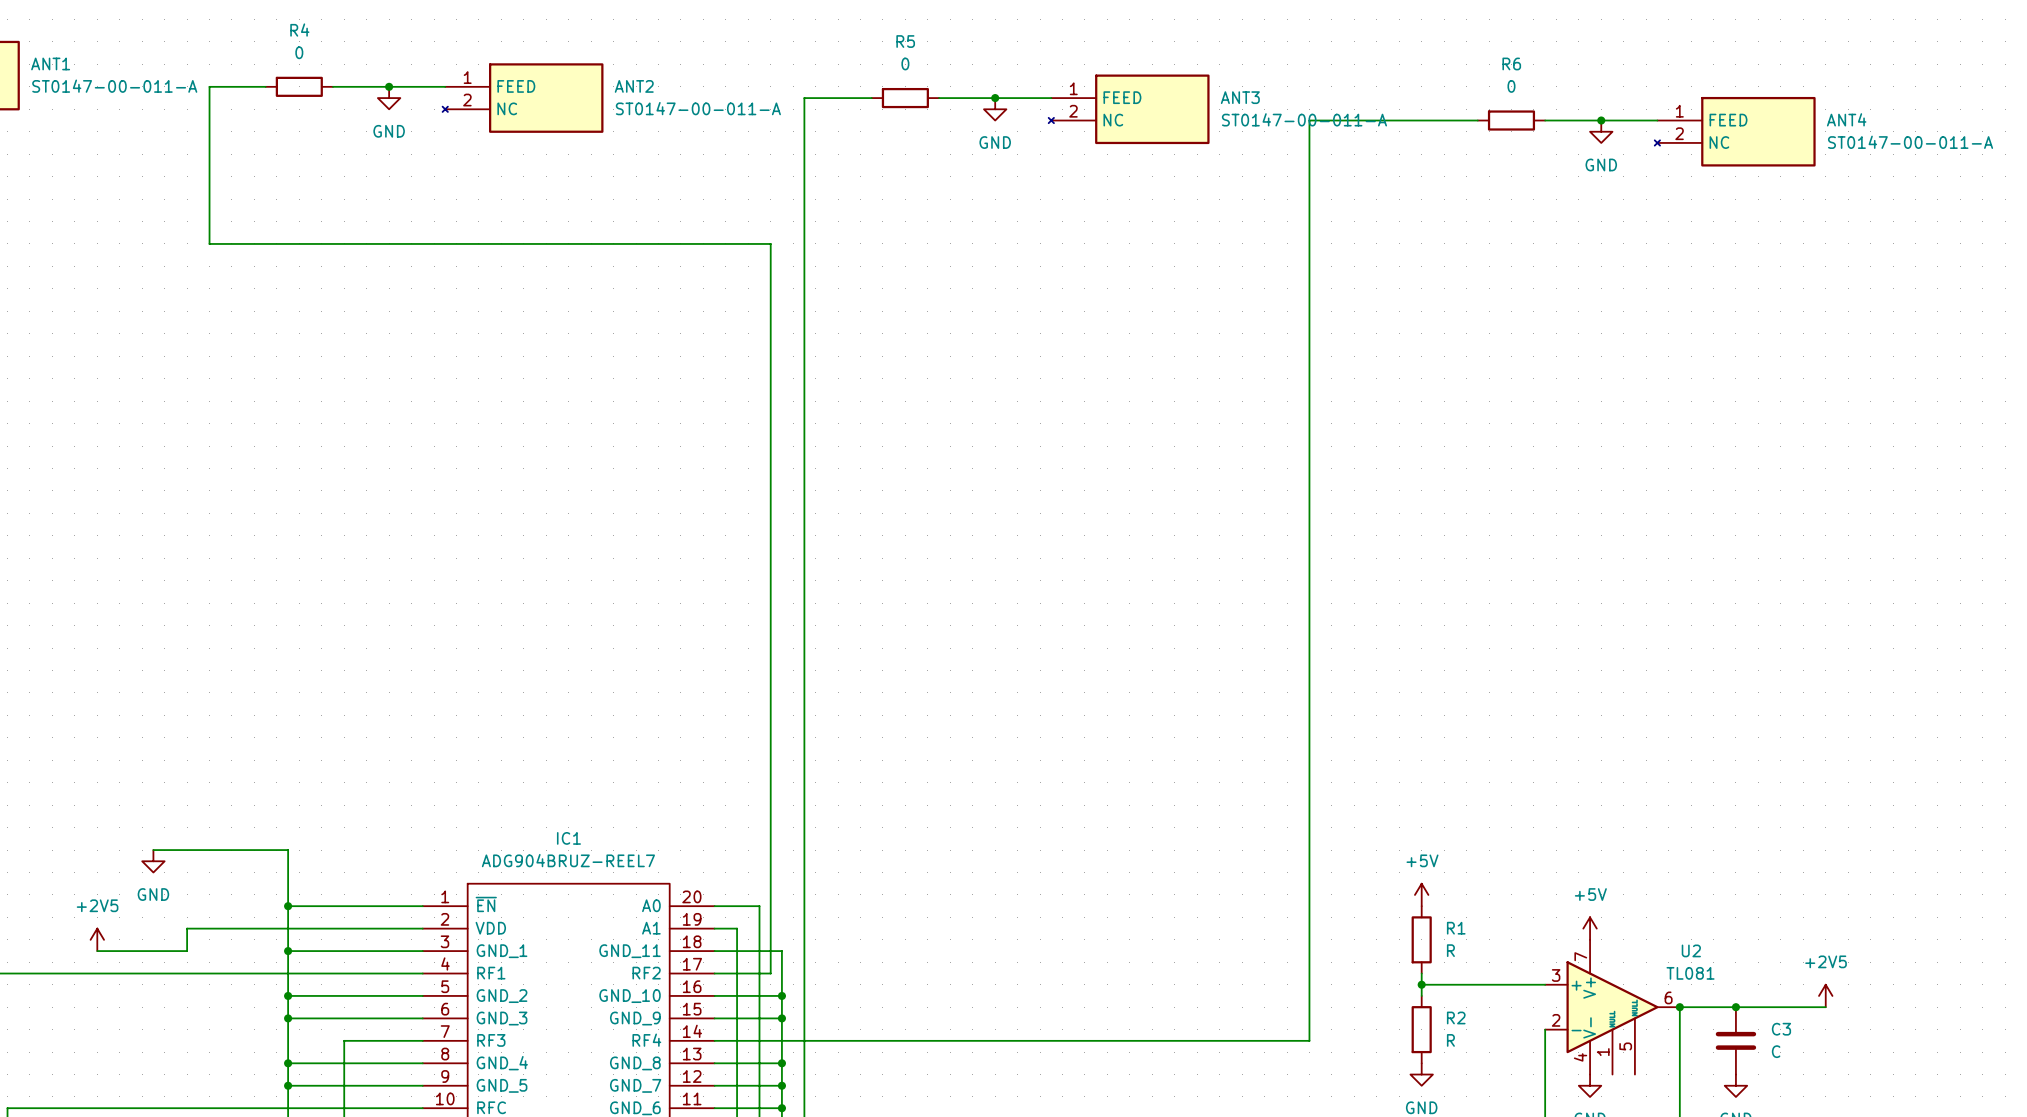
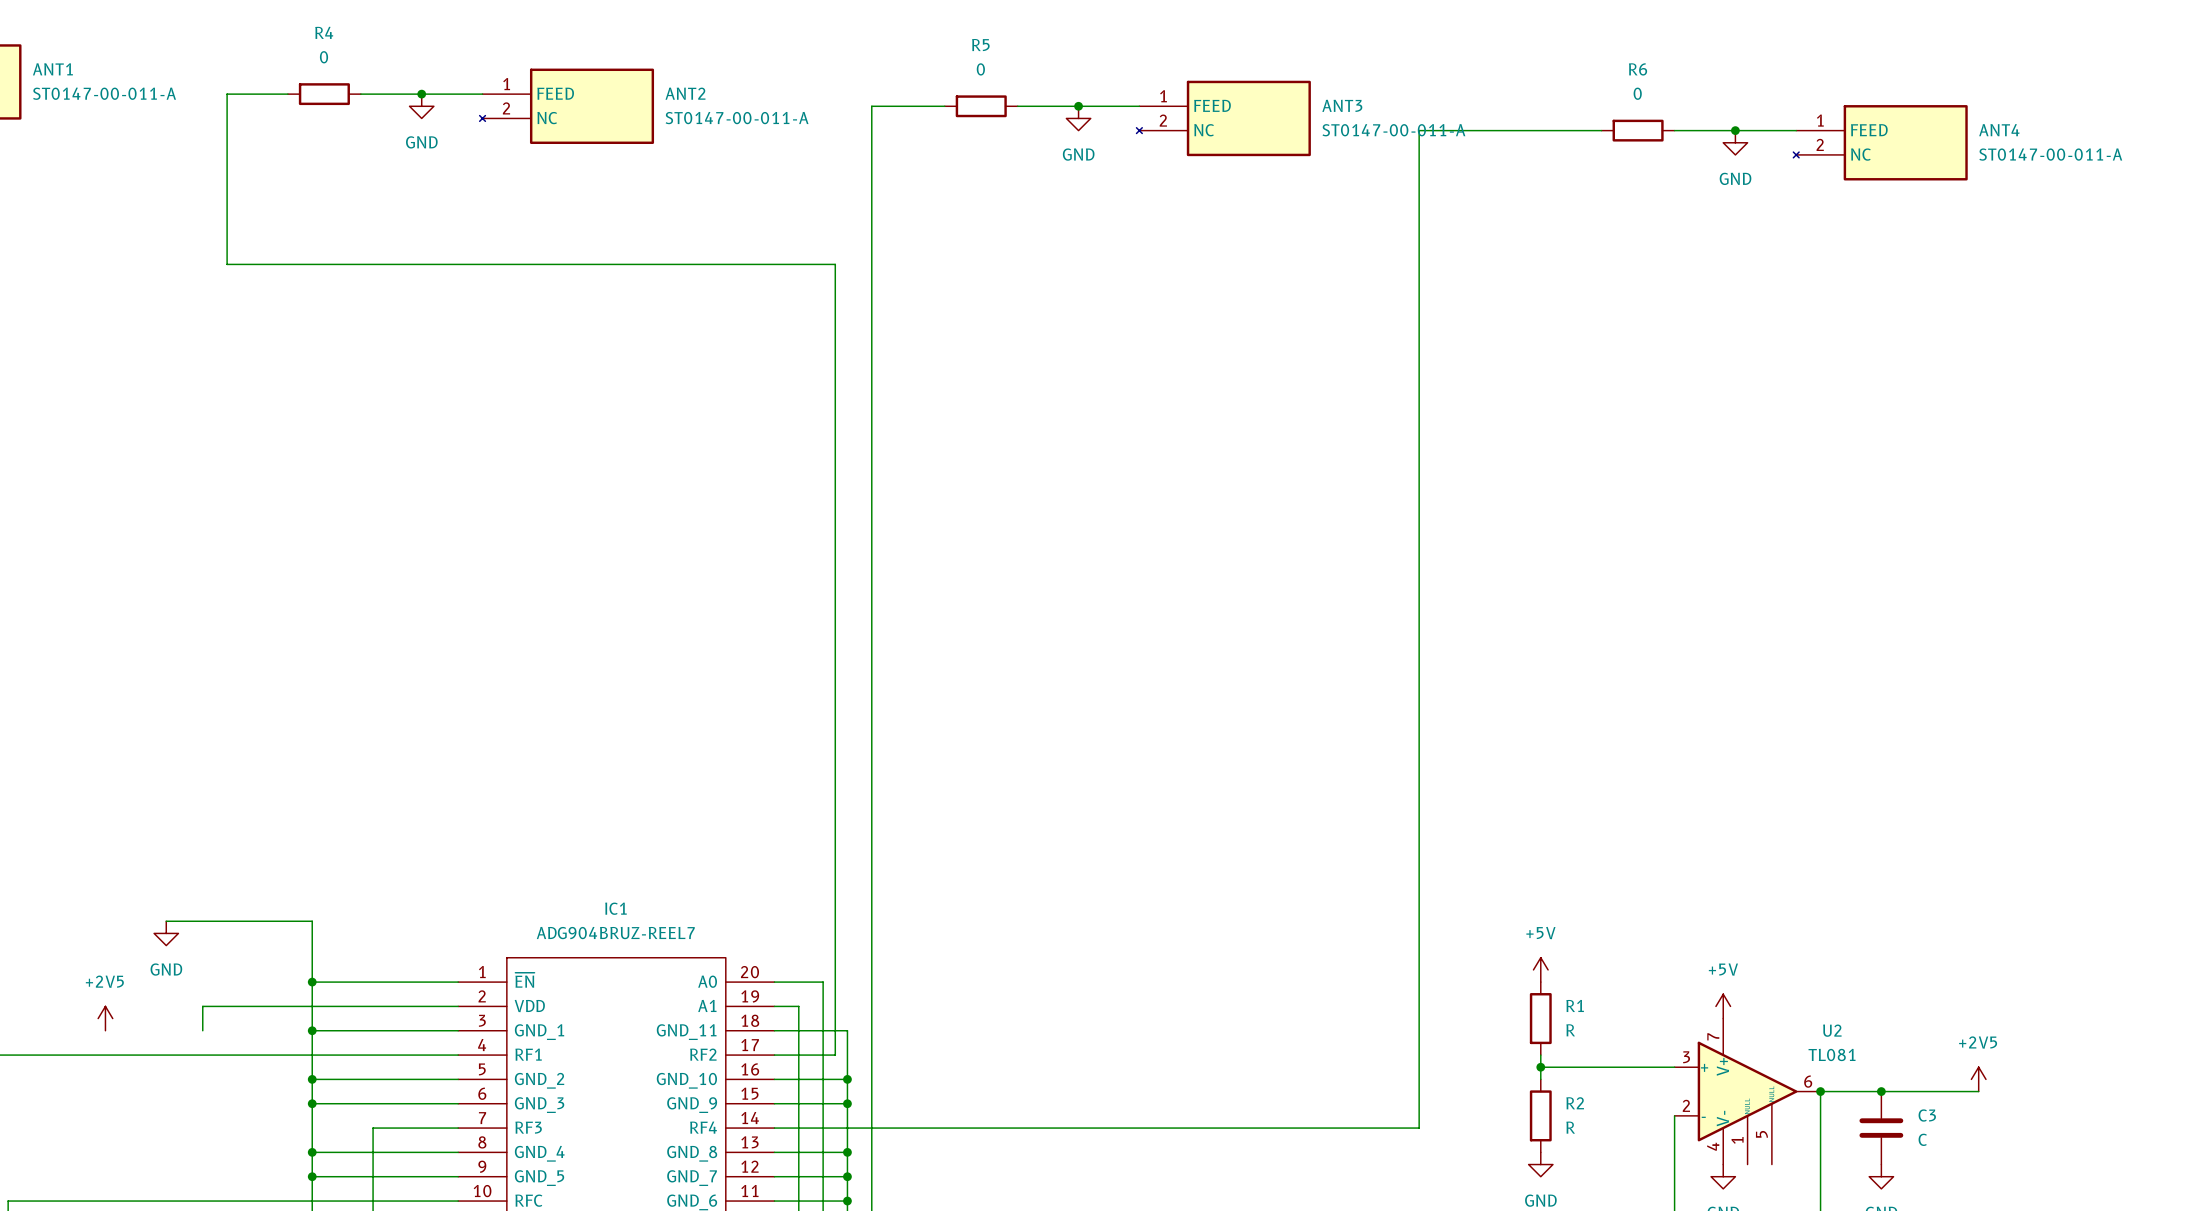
wire: (97, 951) (187, 951) -> none

